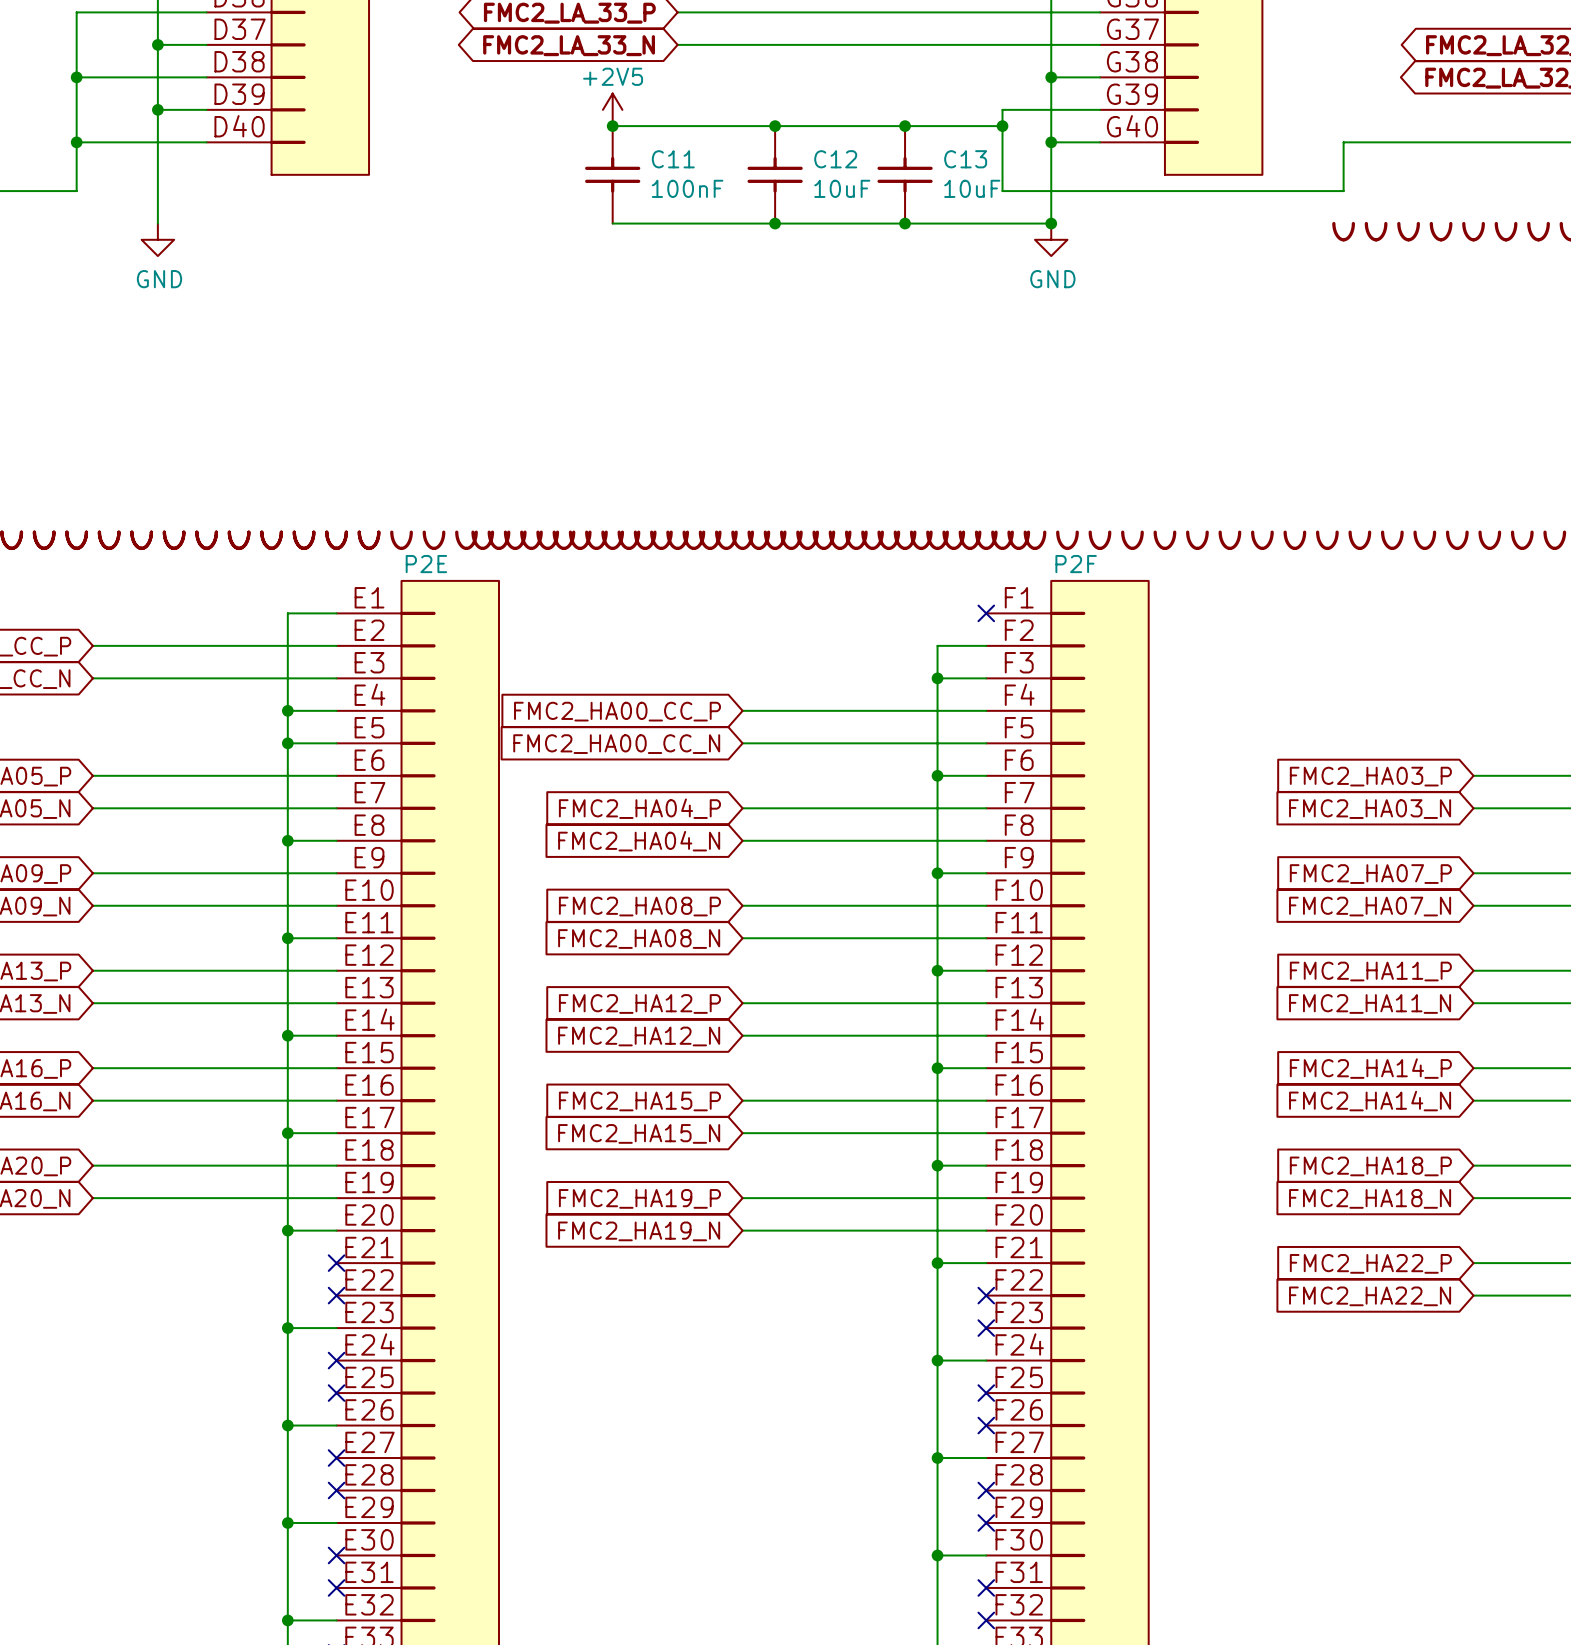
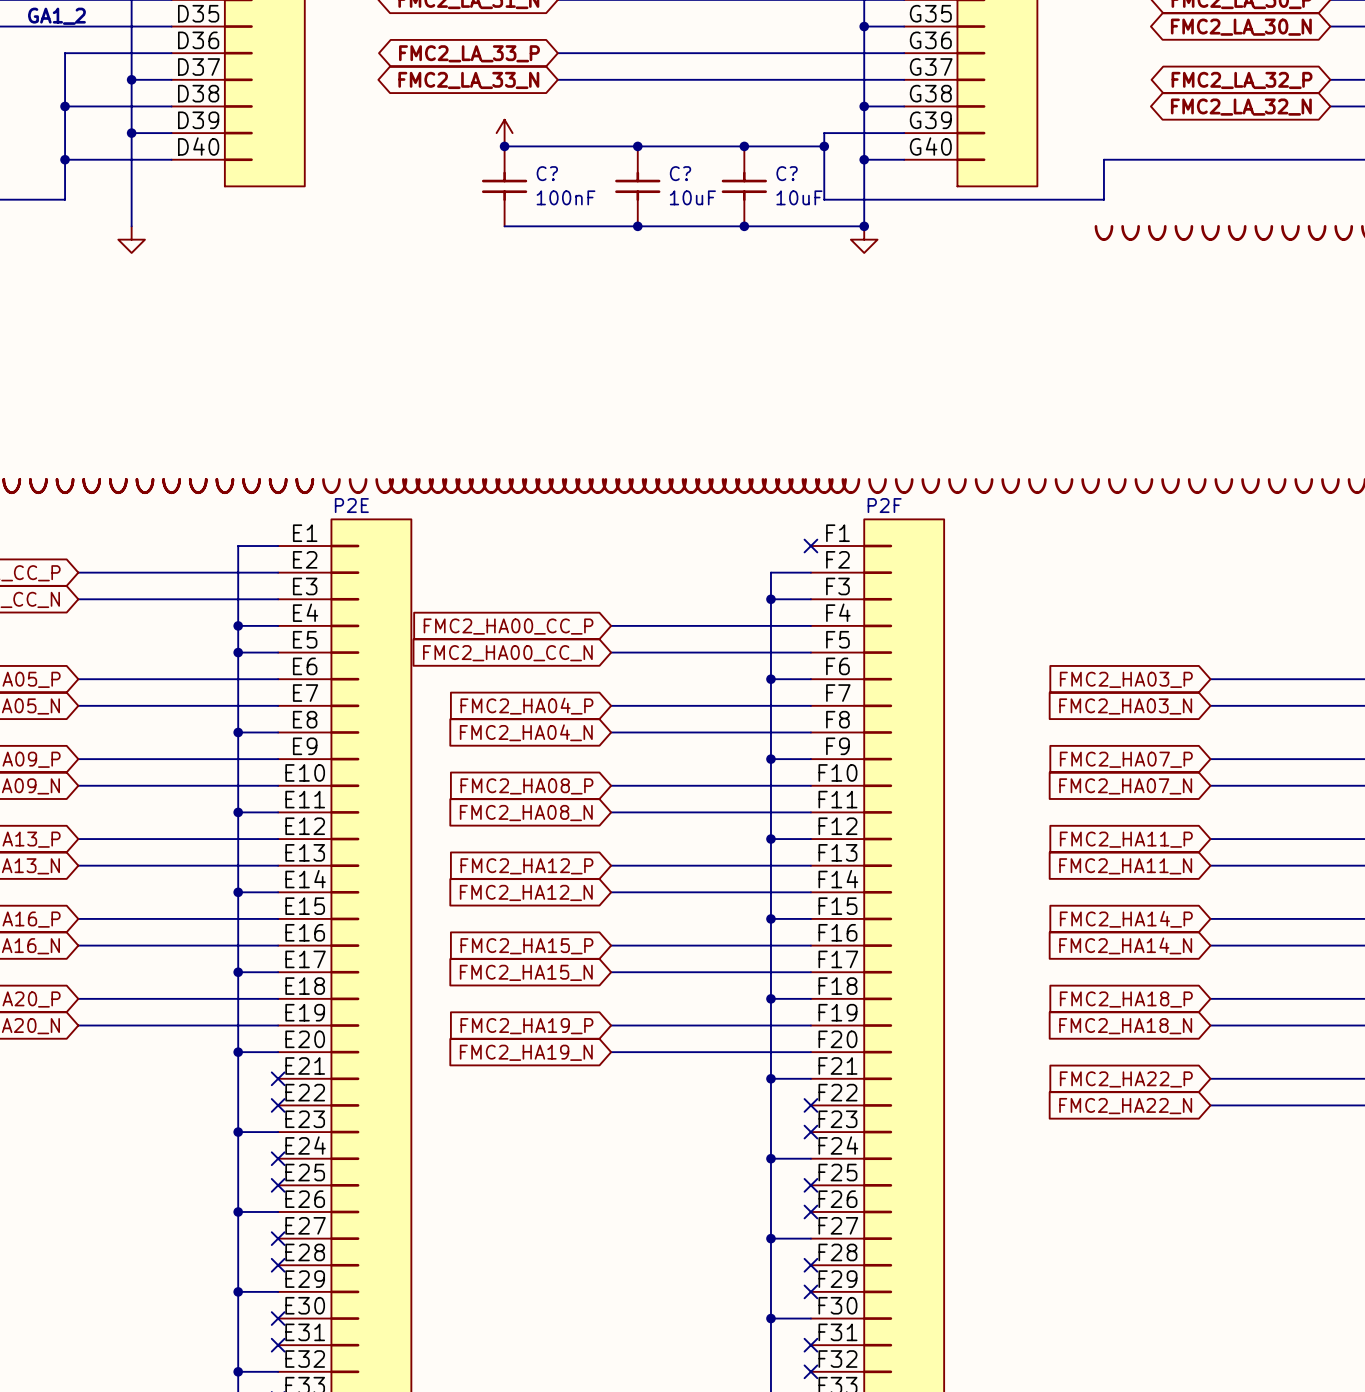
power symbol text: +2V5 (613, 76) -> none
C11 name: C11 (673, 159) -> C? (547, 173)
C12 name: C12 (835, 159) -> C? (680, 173)
C13 name: C13 (965, 159) -> C? (787, 173)
power symbol text: GND (159, 279) -> none
power symbol text: GND (1052, 279) -> none

